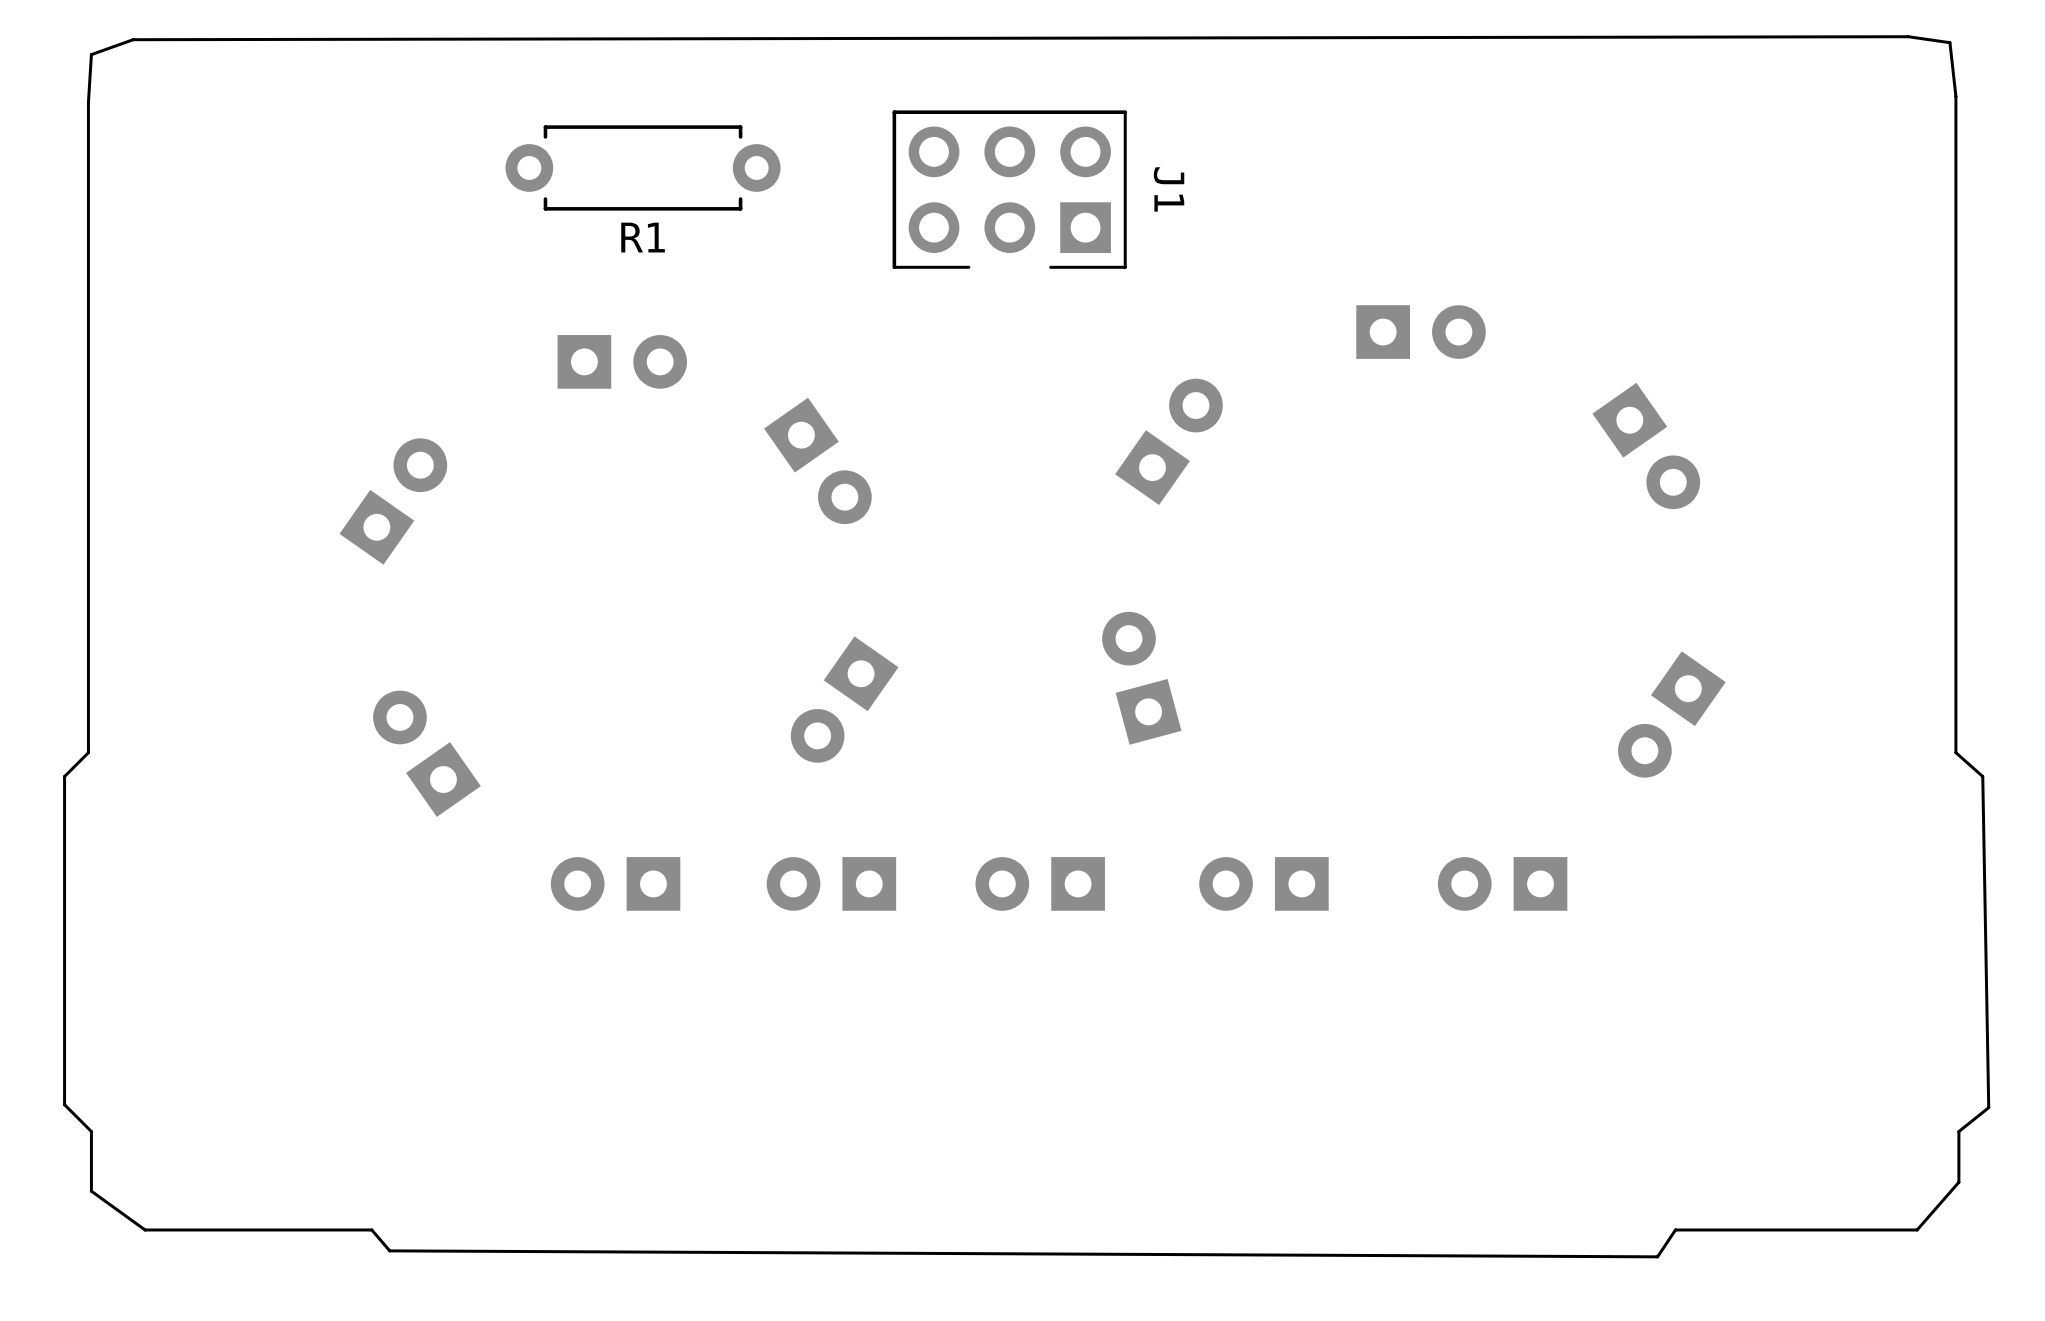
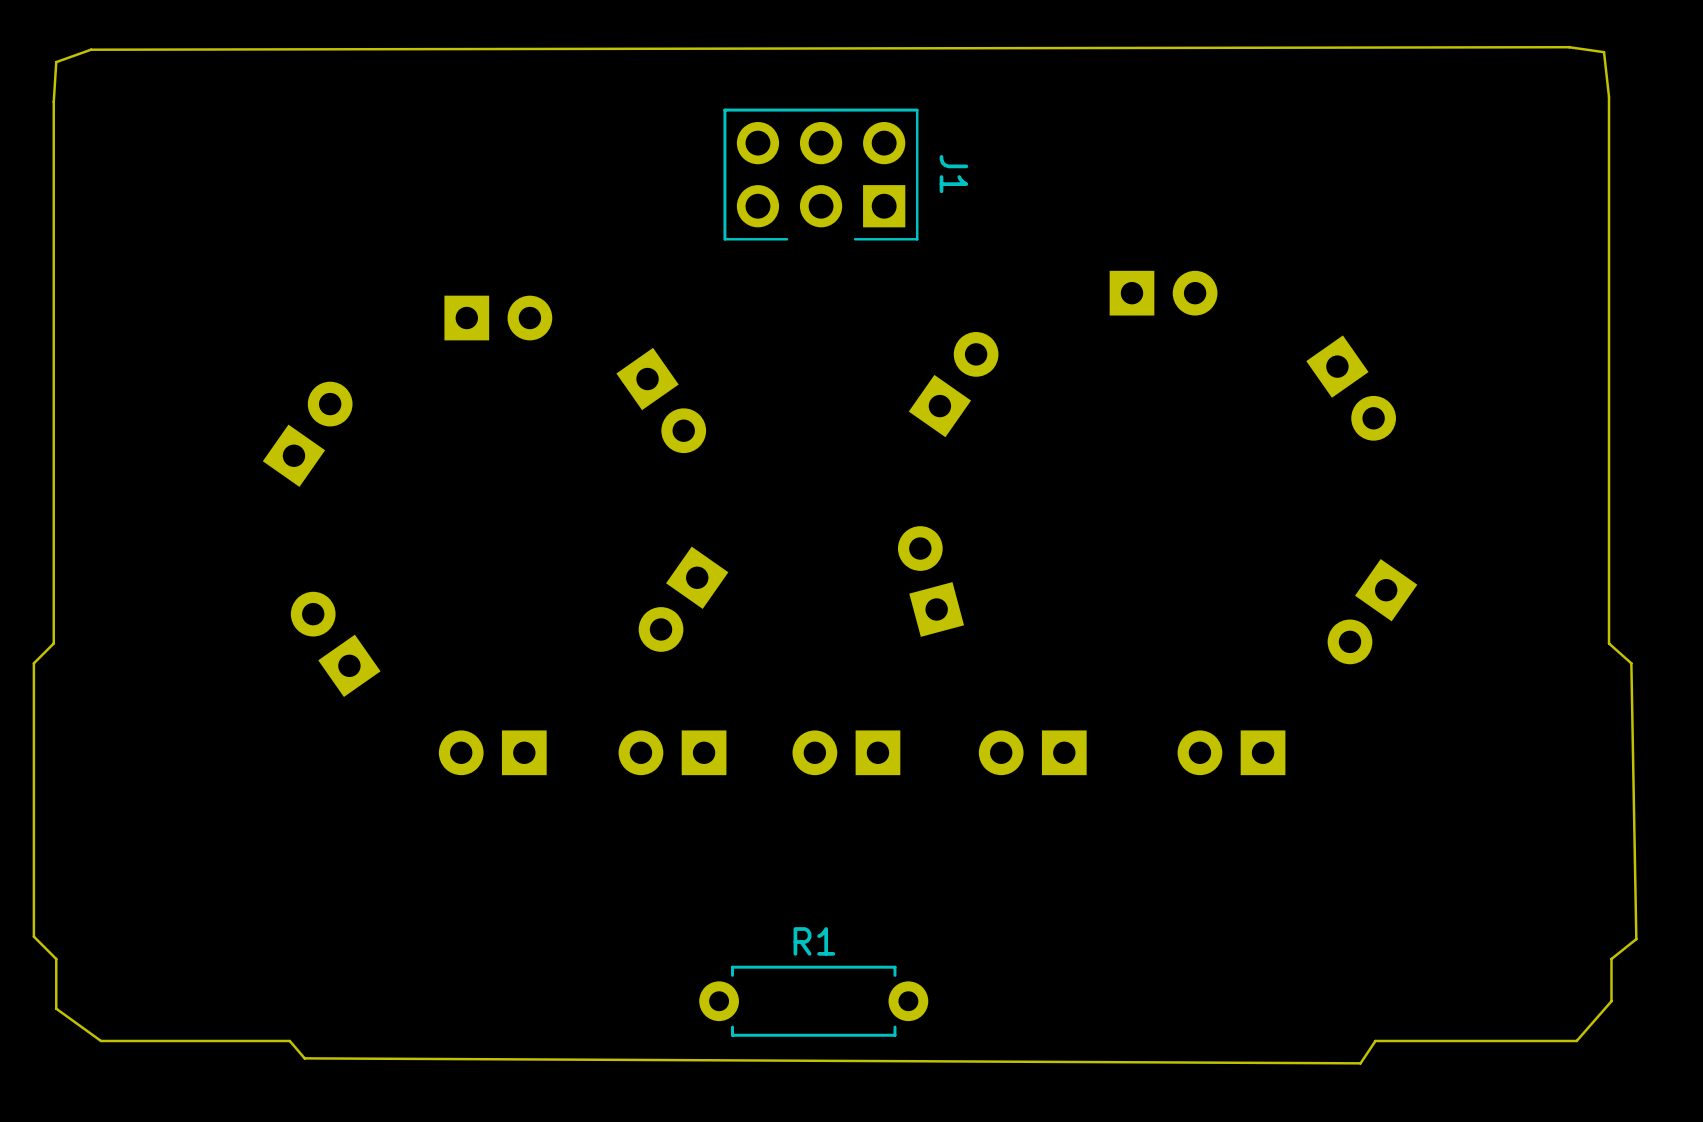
R1 position: (643, 167) -> (813, 1001)
R1 name position: R1 (643, 237) -> R1 (814, 941)

